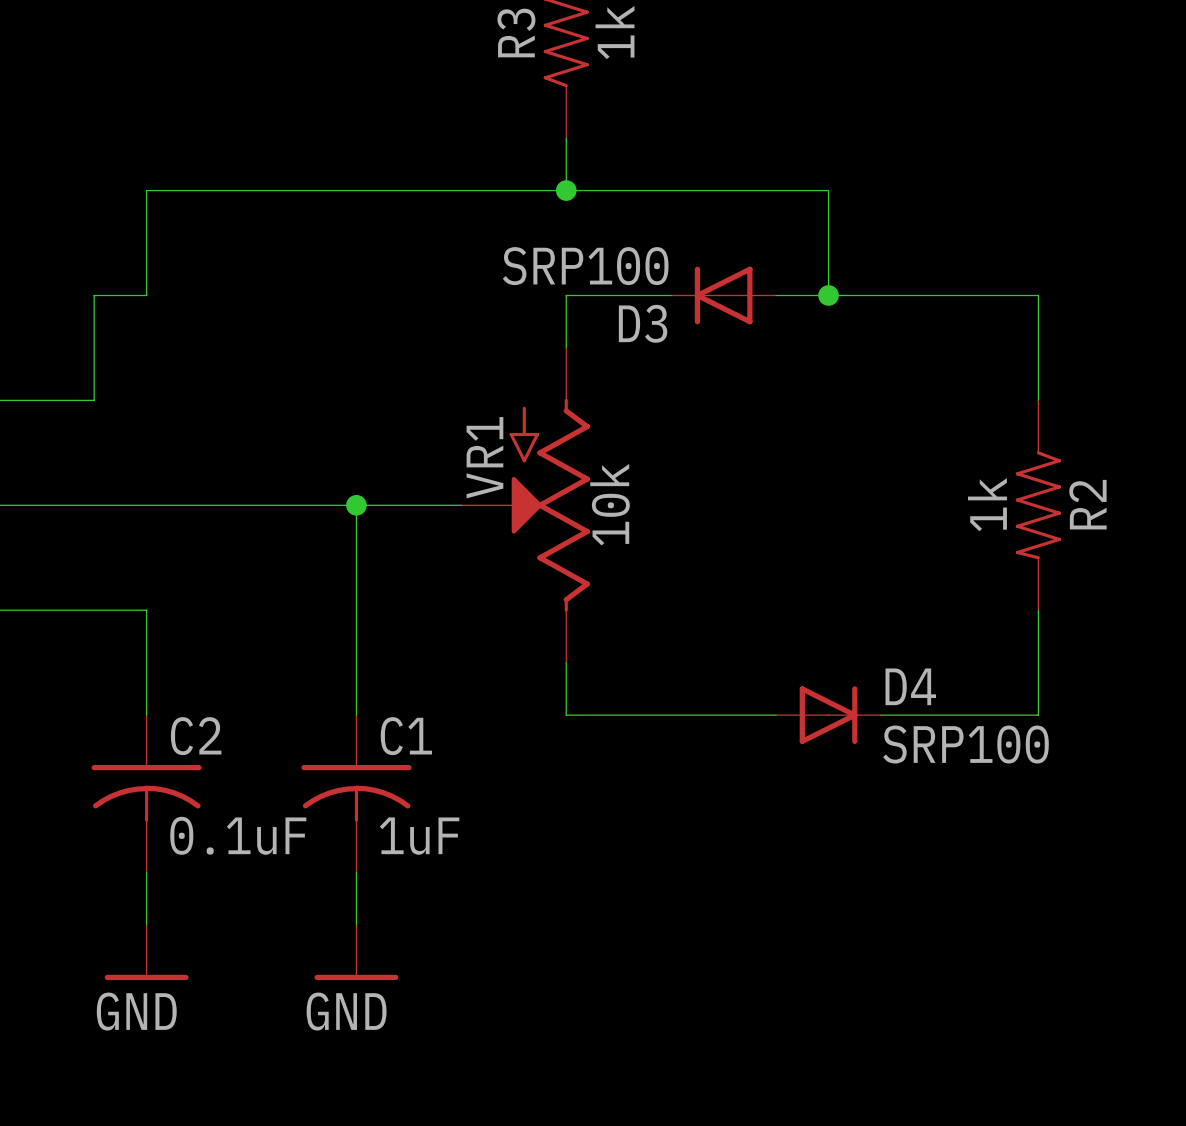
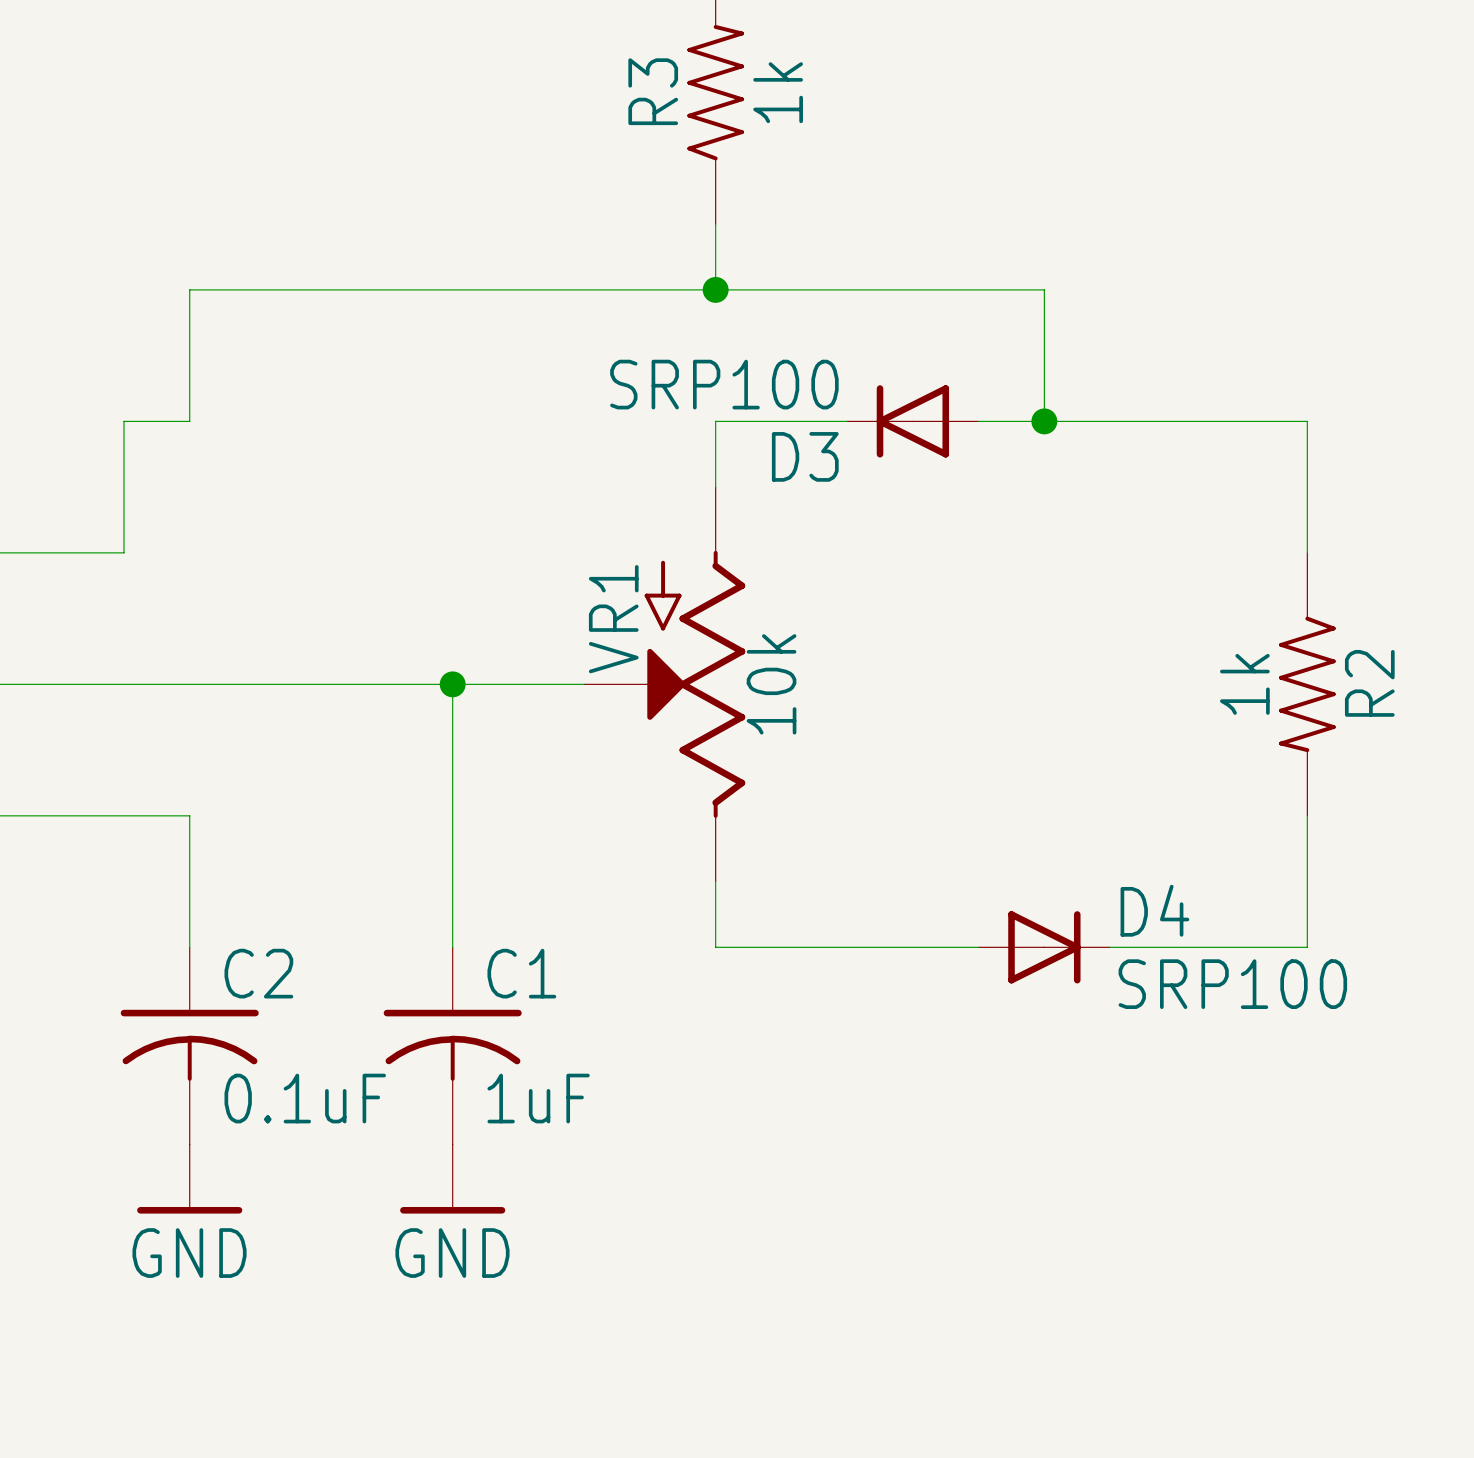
power symbol position: GND (146, 952) -> GND (189, 1179)
power symbol position: GND (356, 952) -> GND (452, 1179)

